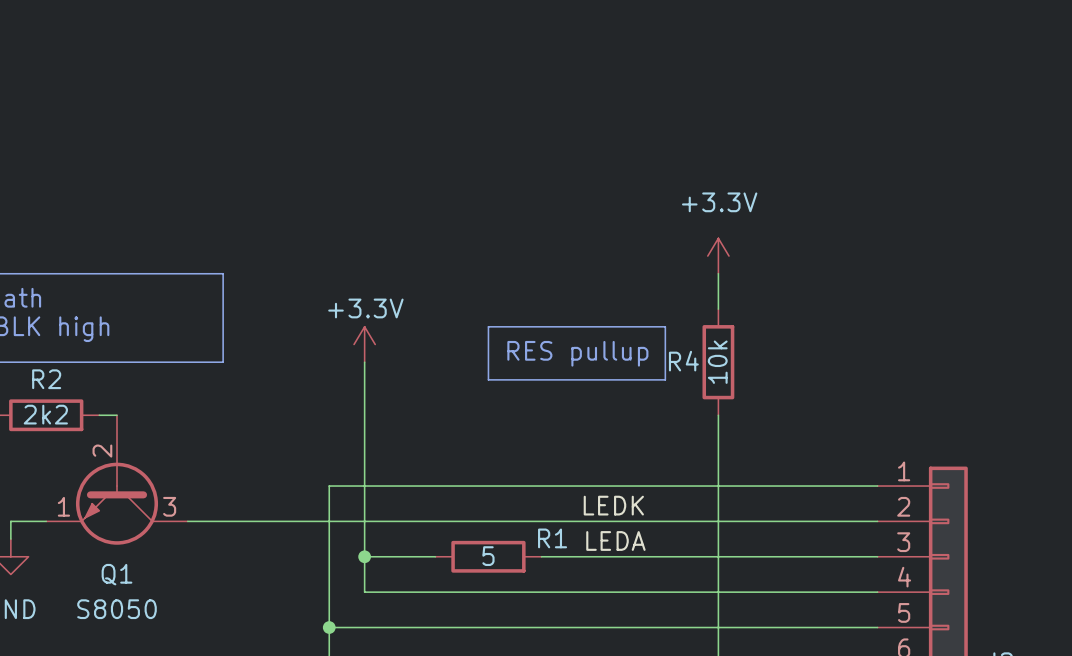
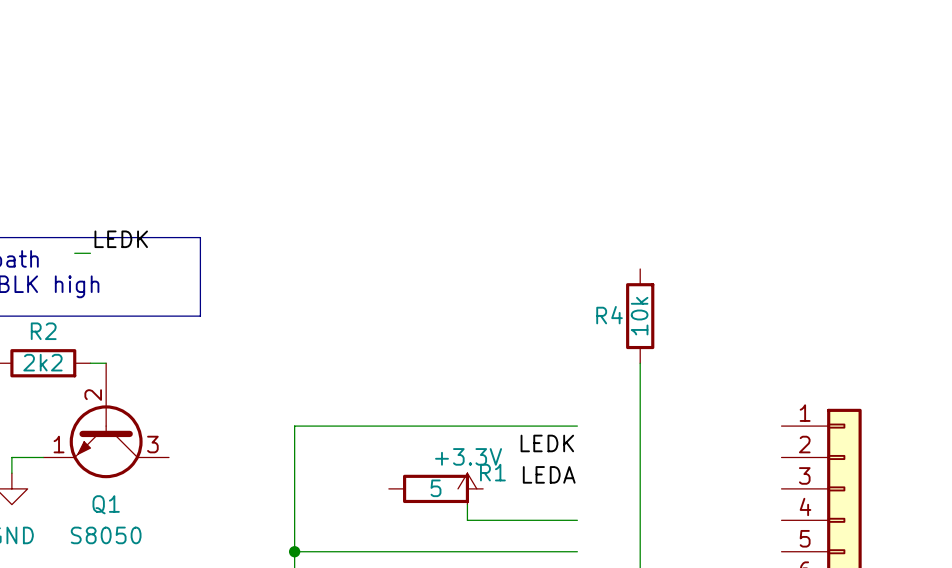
power symbol: +3.3V (718, 256) -> none
wire: (718, 273) (718, 309) -> none
label: none -> LEDK (121, 239)
wire: none -> (74, 253) (90, 253)
line: (488, 326) (665, 326) (665, 379) (488, 379) (488, 326) -> none
power symbol: +3.3V (364, 344) -> none
text: RES pullup (577, 353) -> none
wire: (364, 362) (364, 592) (523, 592) -> (467, 504) (467, 520)
wire: (647, 486) (877, 486) -> none
wire: (187, 521) (877, 521) -> none
wire: (364, 556) (435, 556) -> none
junction: (364, 556) -> none
power symbol: none -> +3.3V (467, 488)
wire: (541, 556) (877, 556) -> none
wire: (647, 592) (877, 592) -> none
wire: (647, 627) (877, 627) -> none

